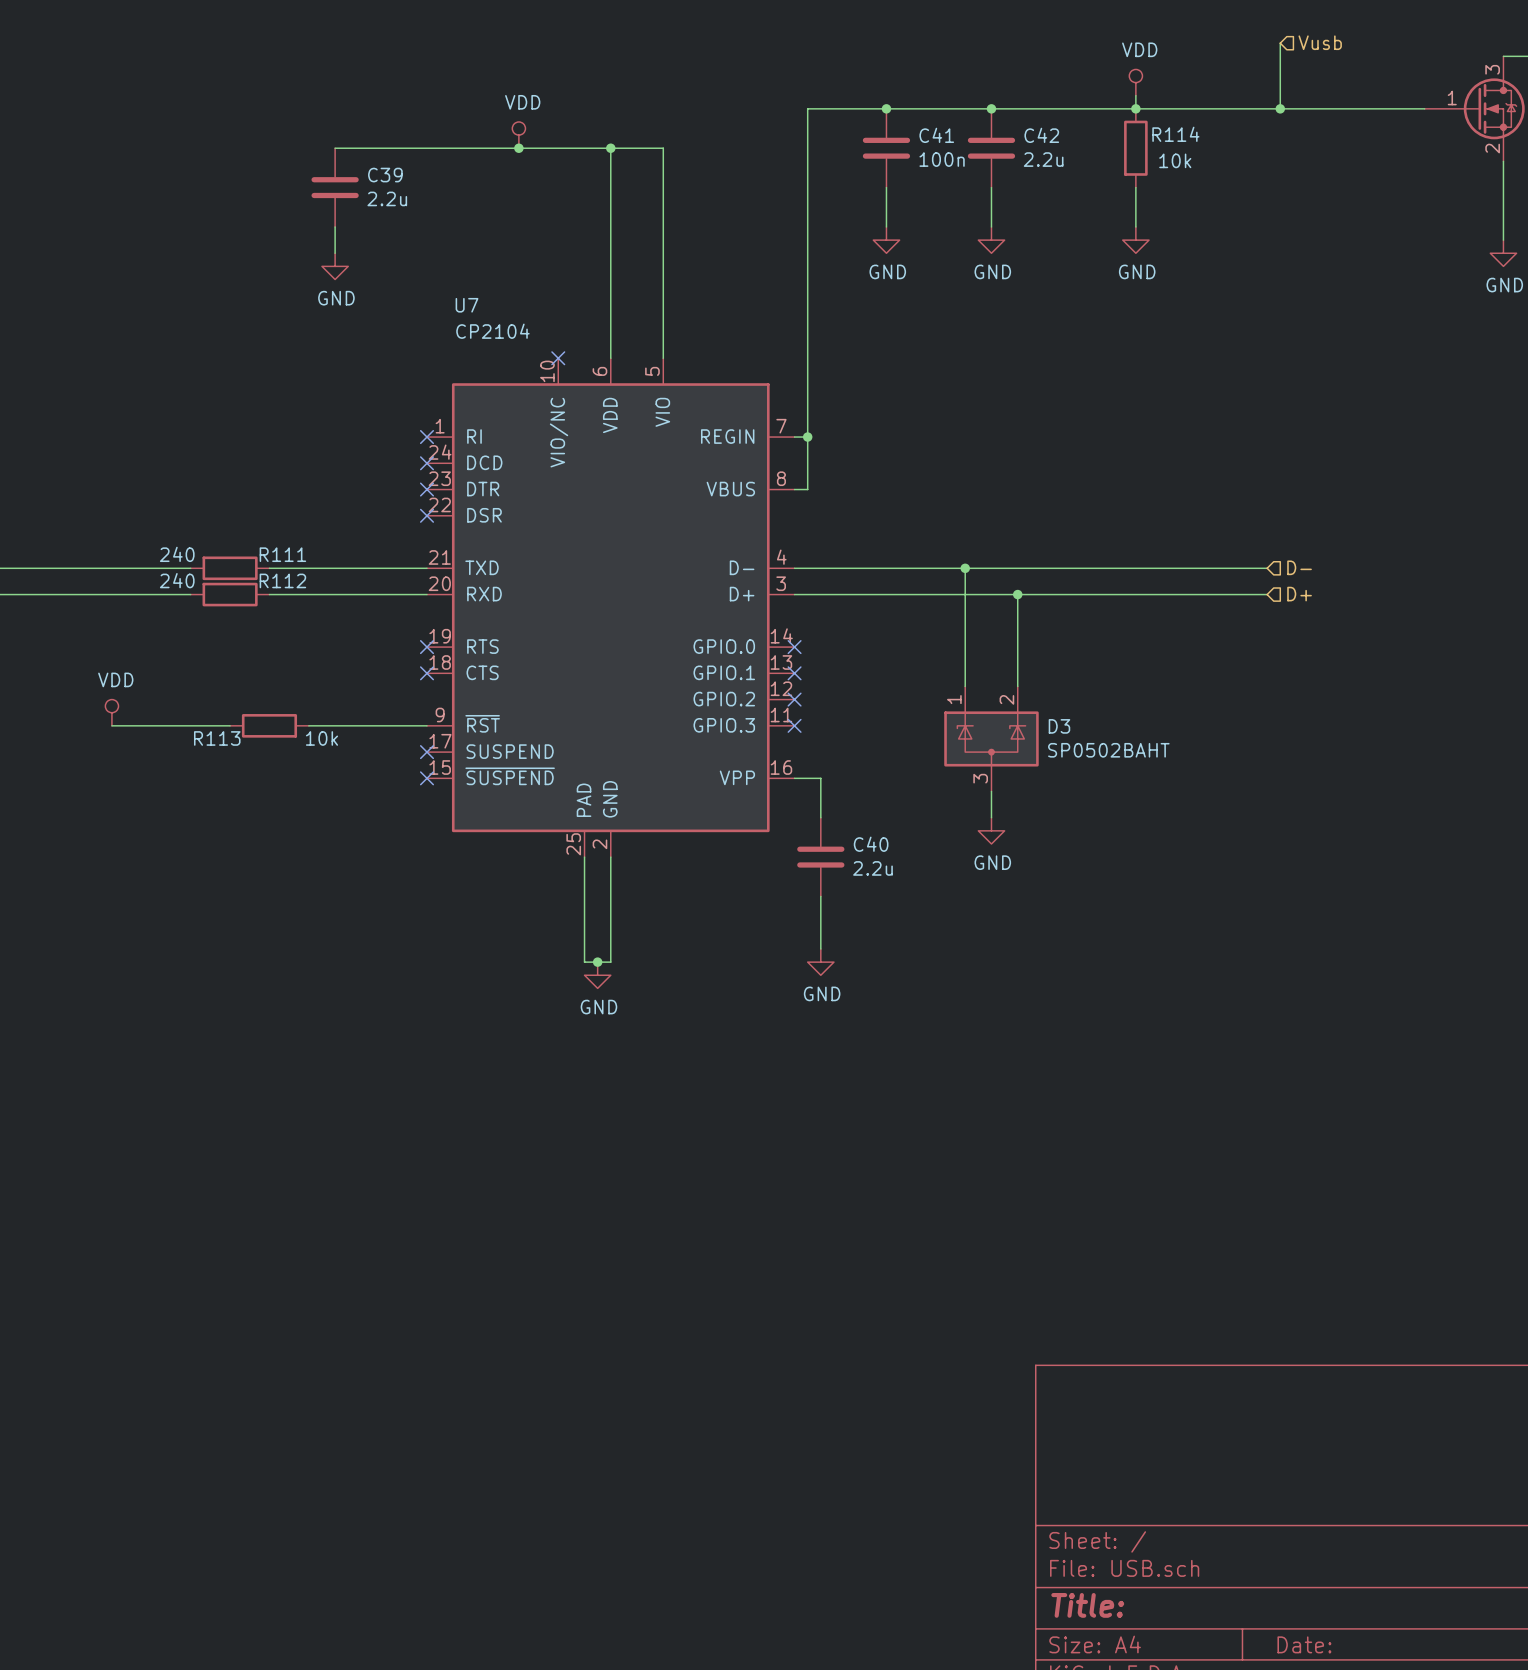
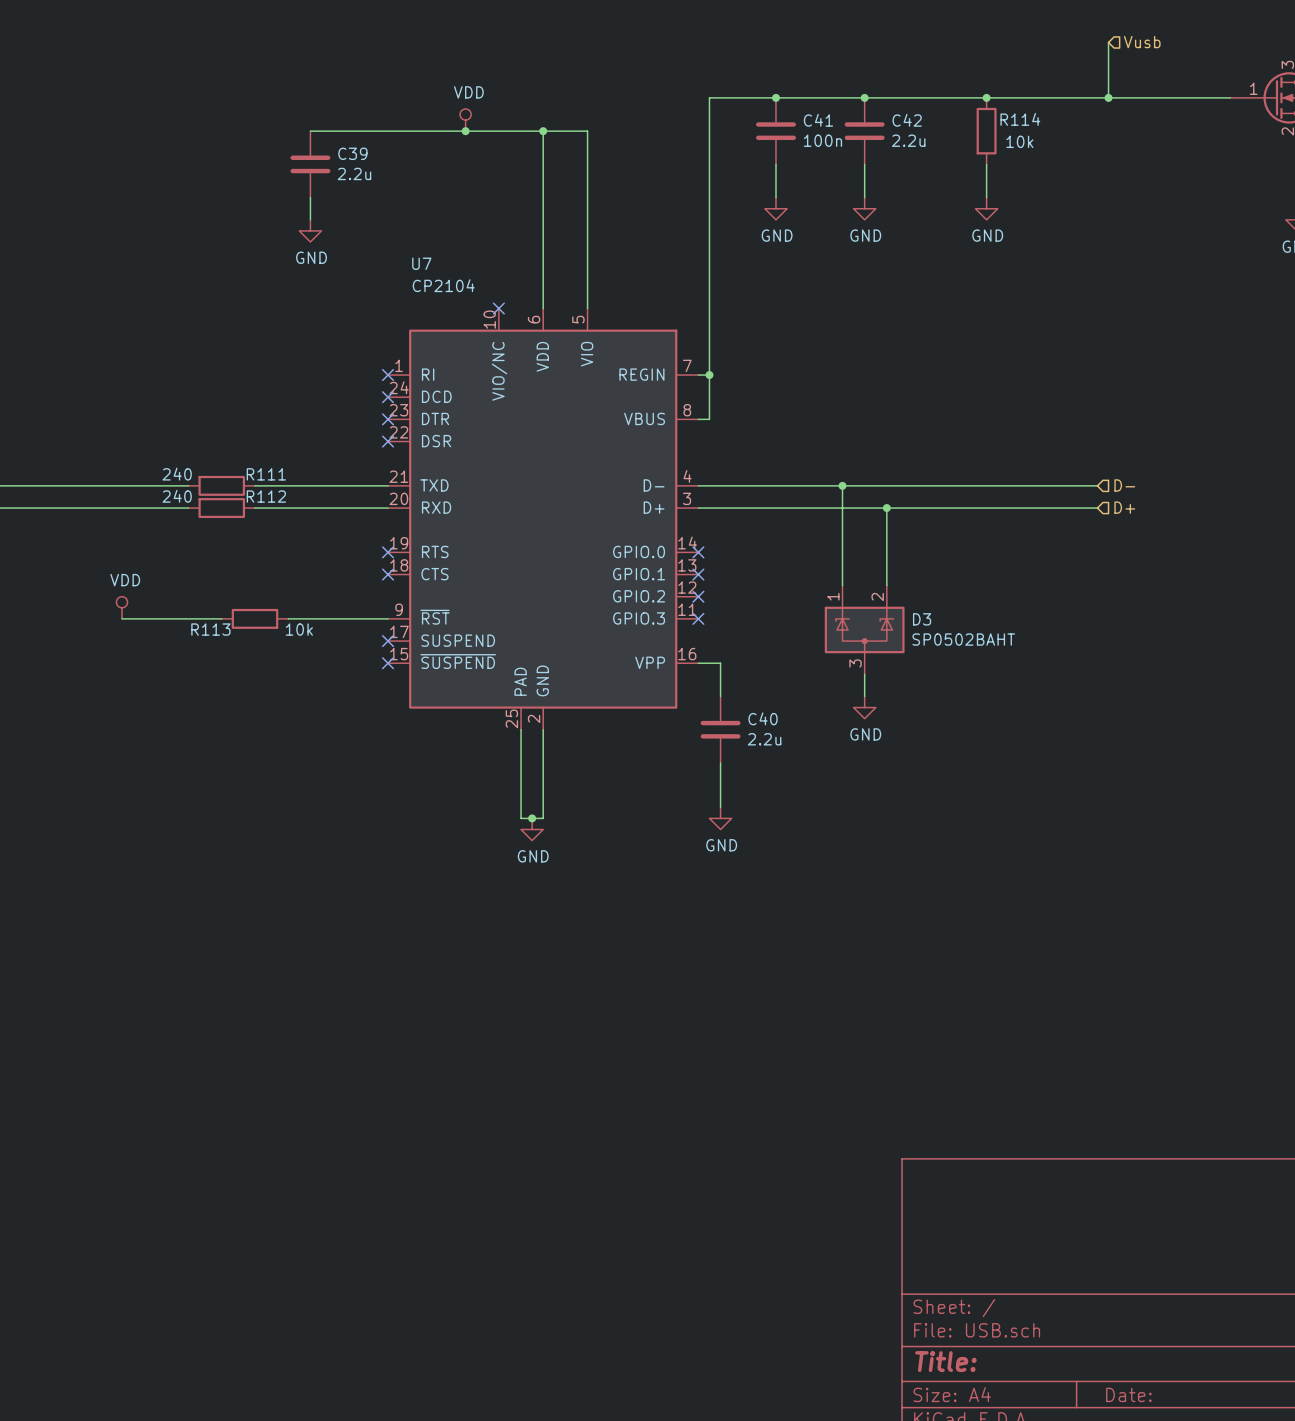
power symbol: VDD (1135, 82) -> none
wire: (1135, 95) (1135, 108) -> none

